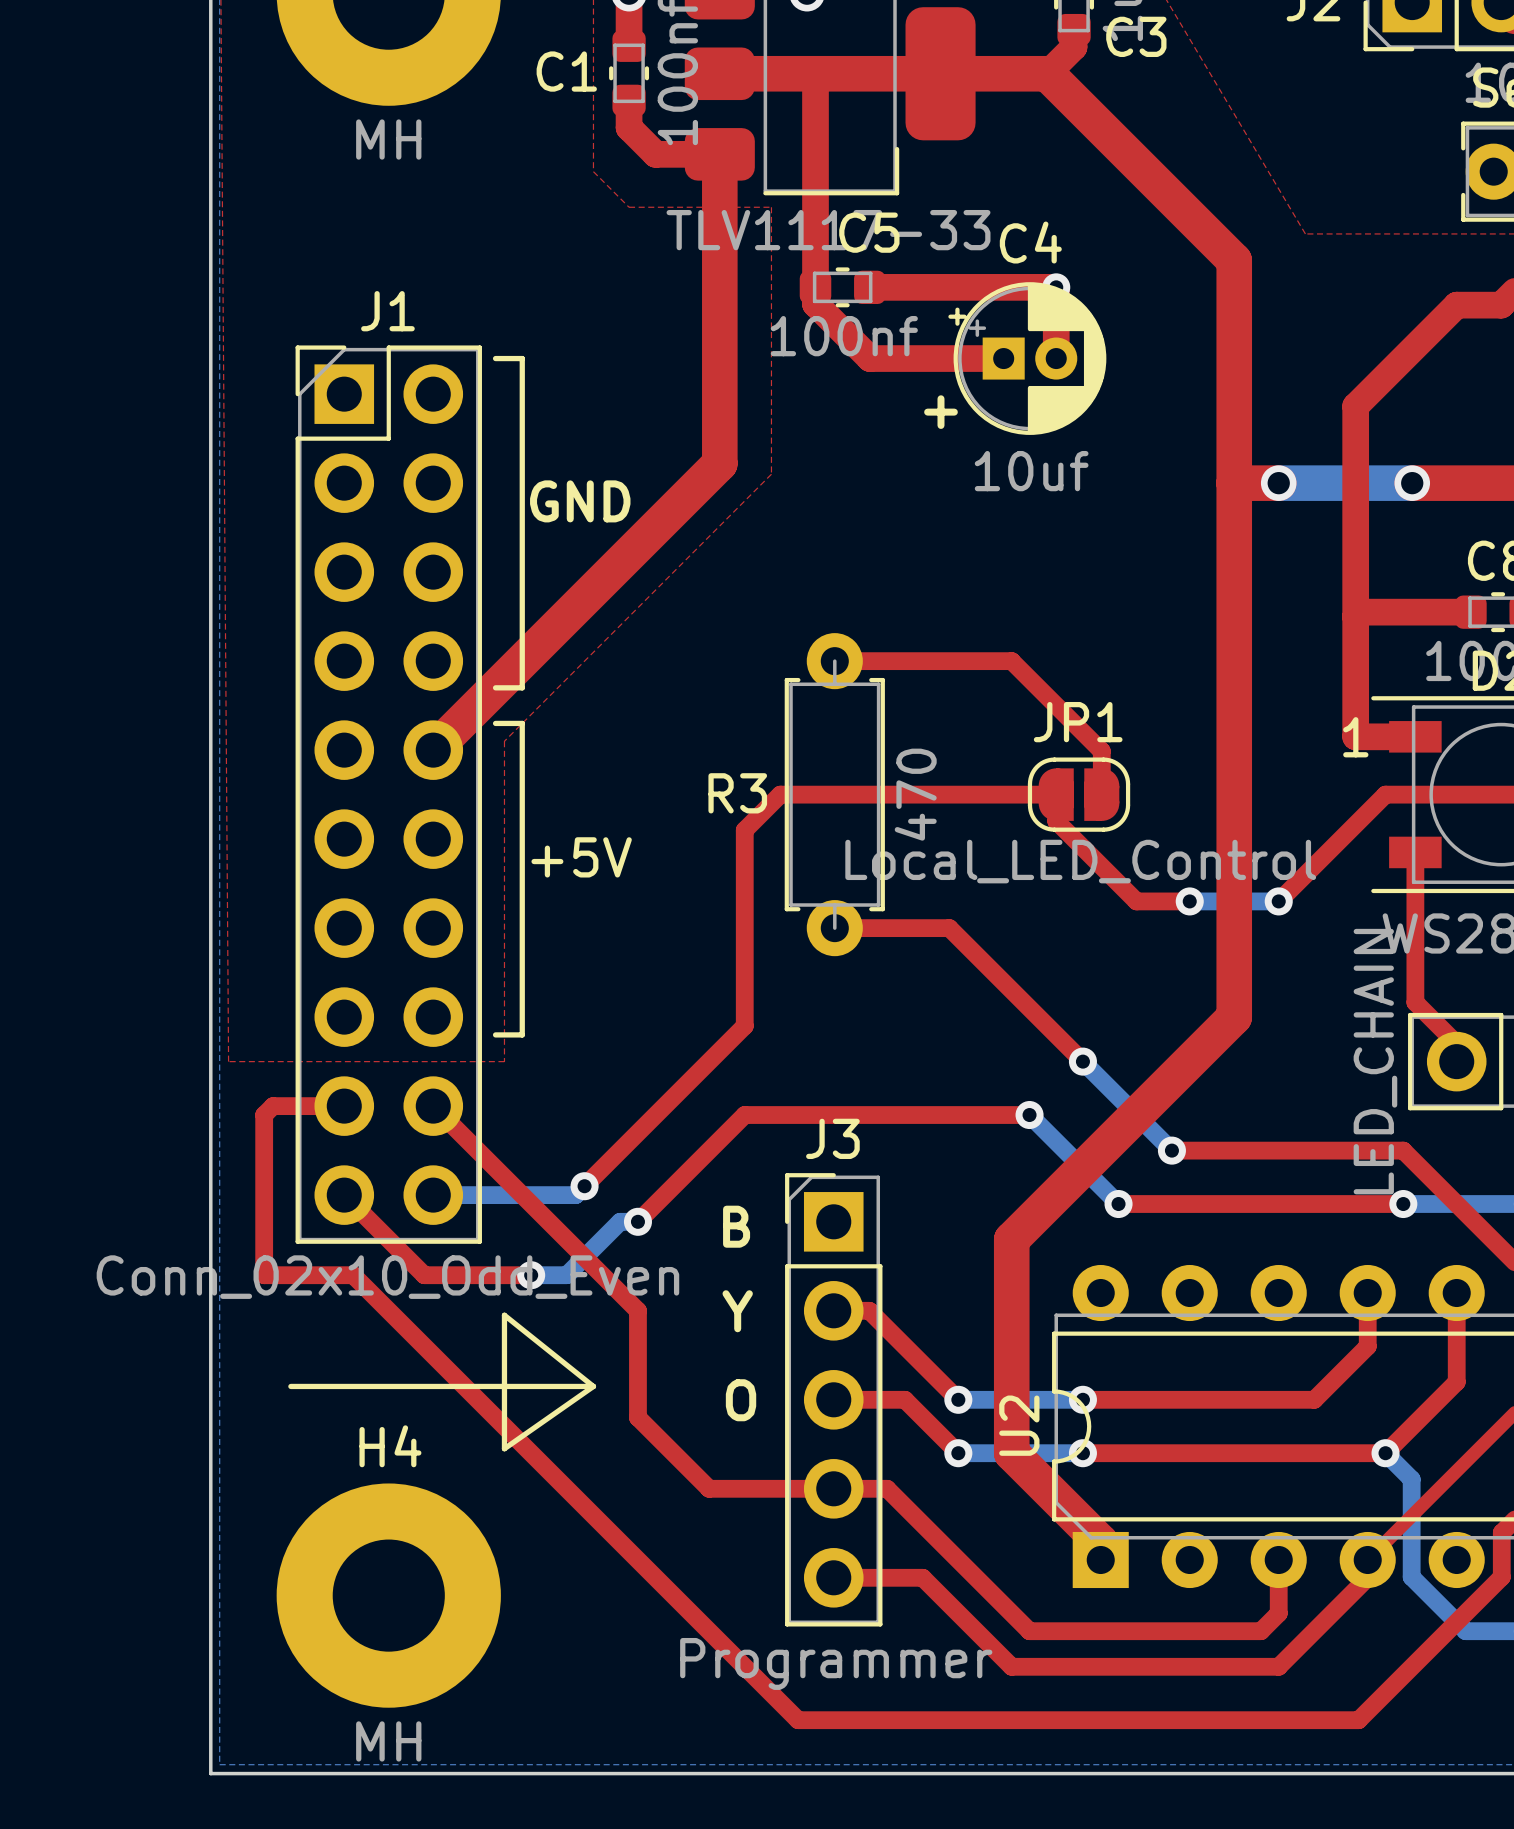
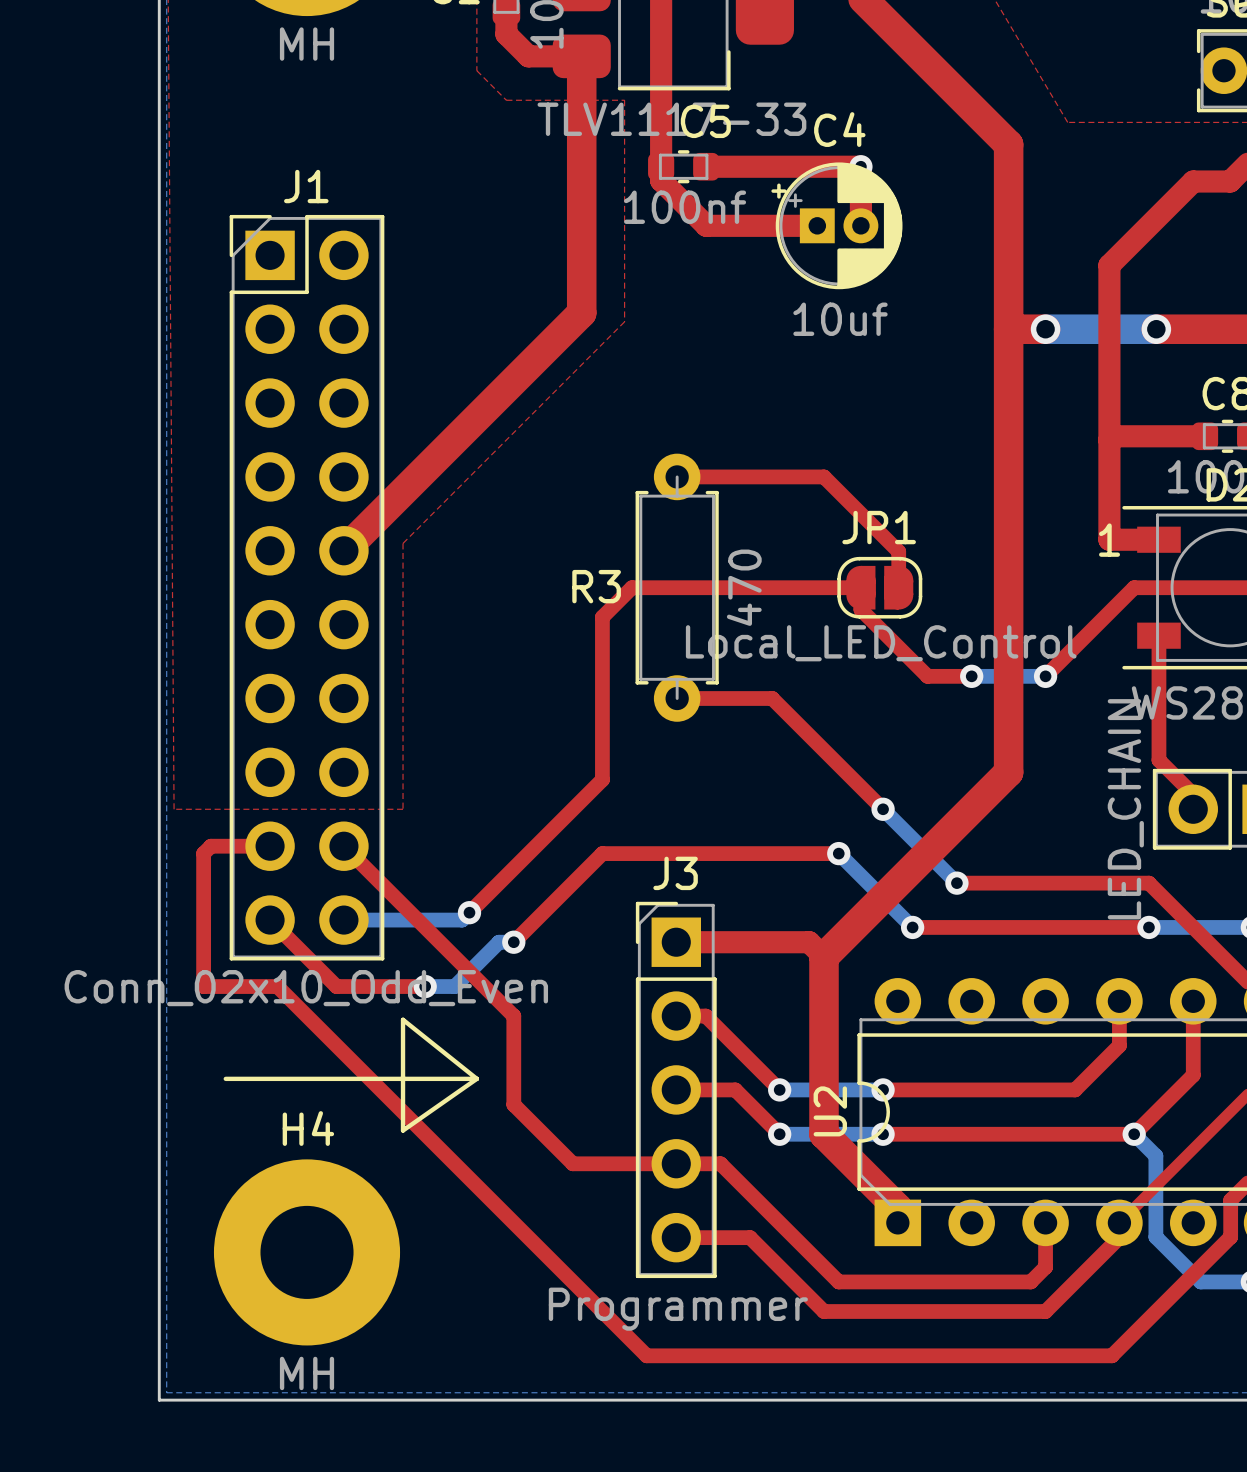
line: (495, 358) (522, 358) (522, 687) (495, 687) -> none
C4 text: + (940, 412) -> none
text: GND (580, 501) -> none
line: (495, 723) (522, 723) (522, 1034) (495, 1034) -> none
text: +5V (581, 857) -> none
top track: none -> (676, 942) (809, 942) (823, 956)
text: B (736, 1226) -> none
text: Y (737, 1311) -> none
text: O (741, 1400) -> none

